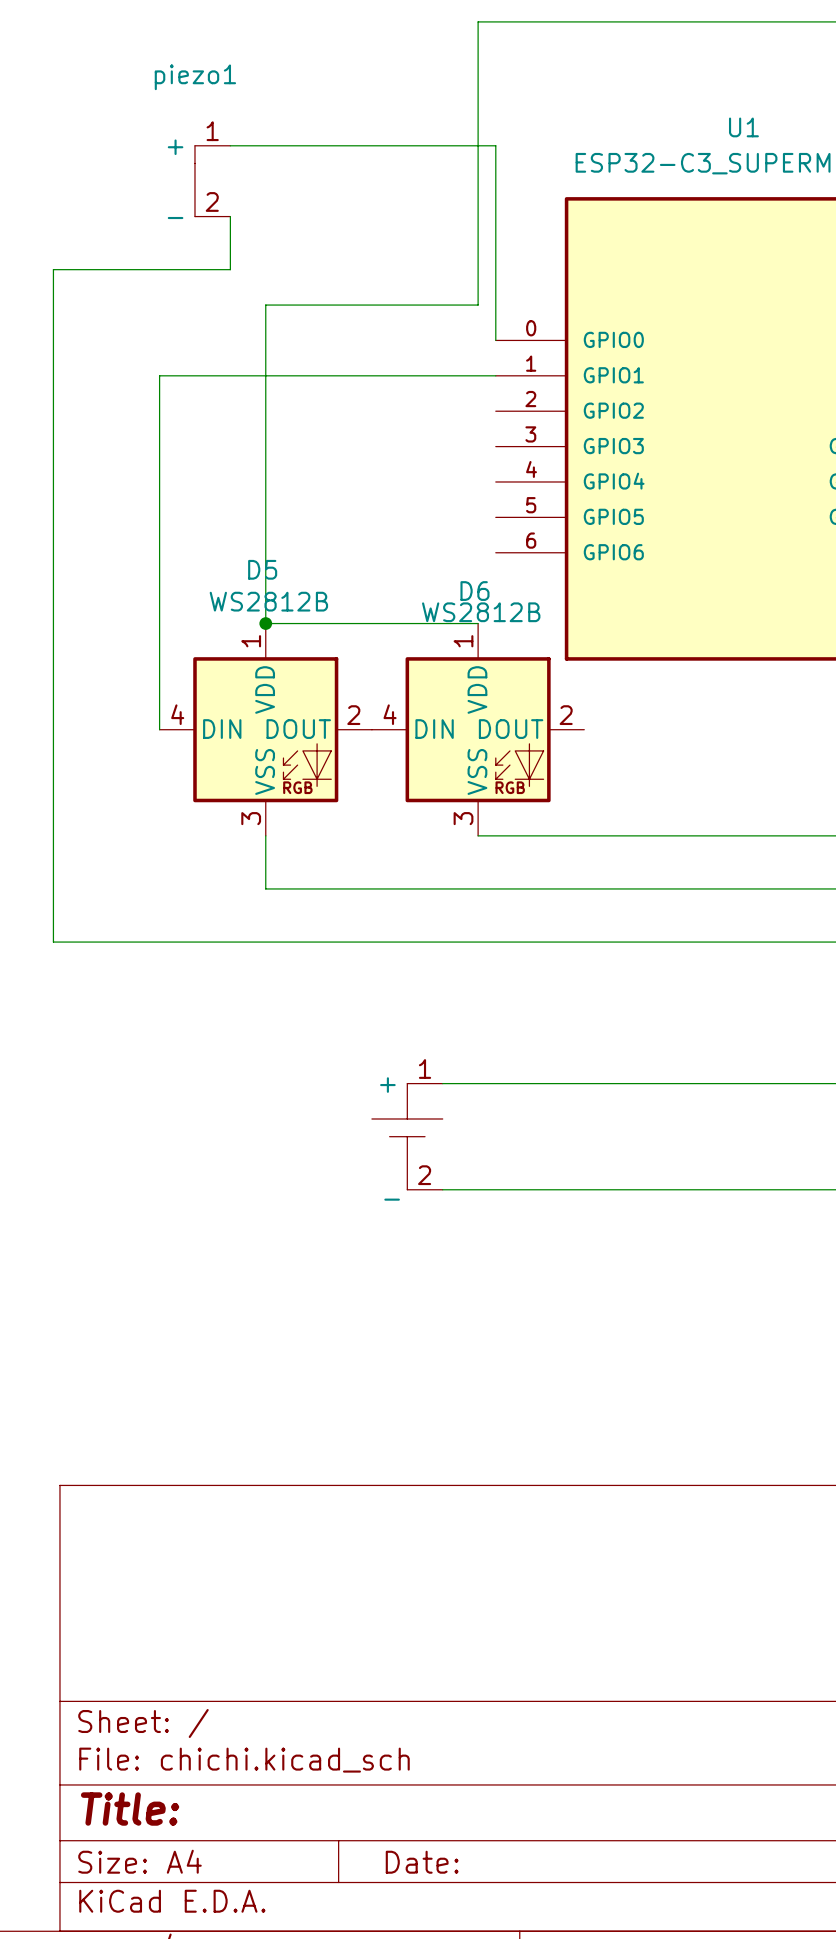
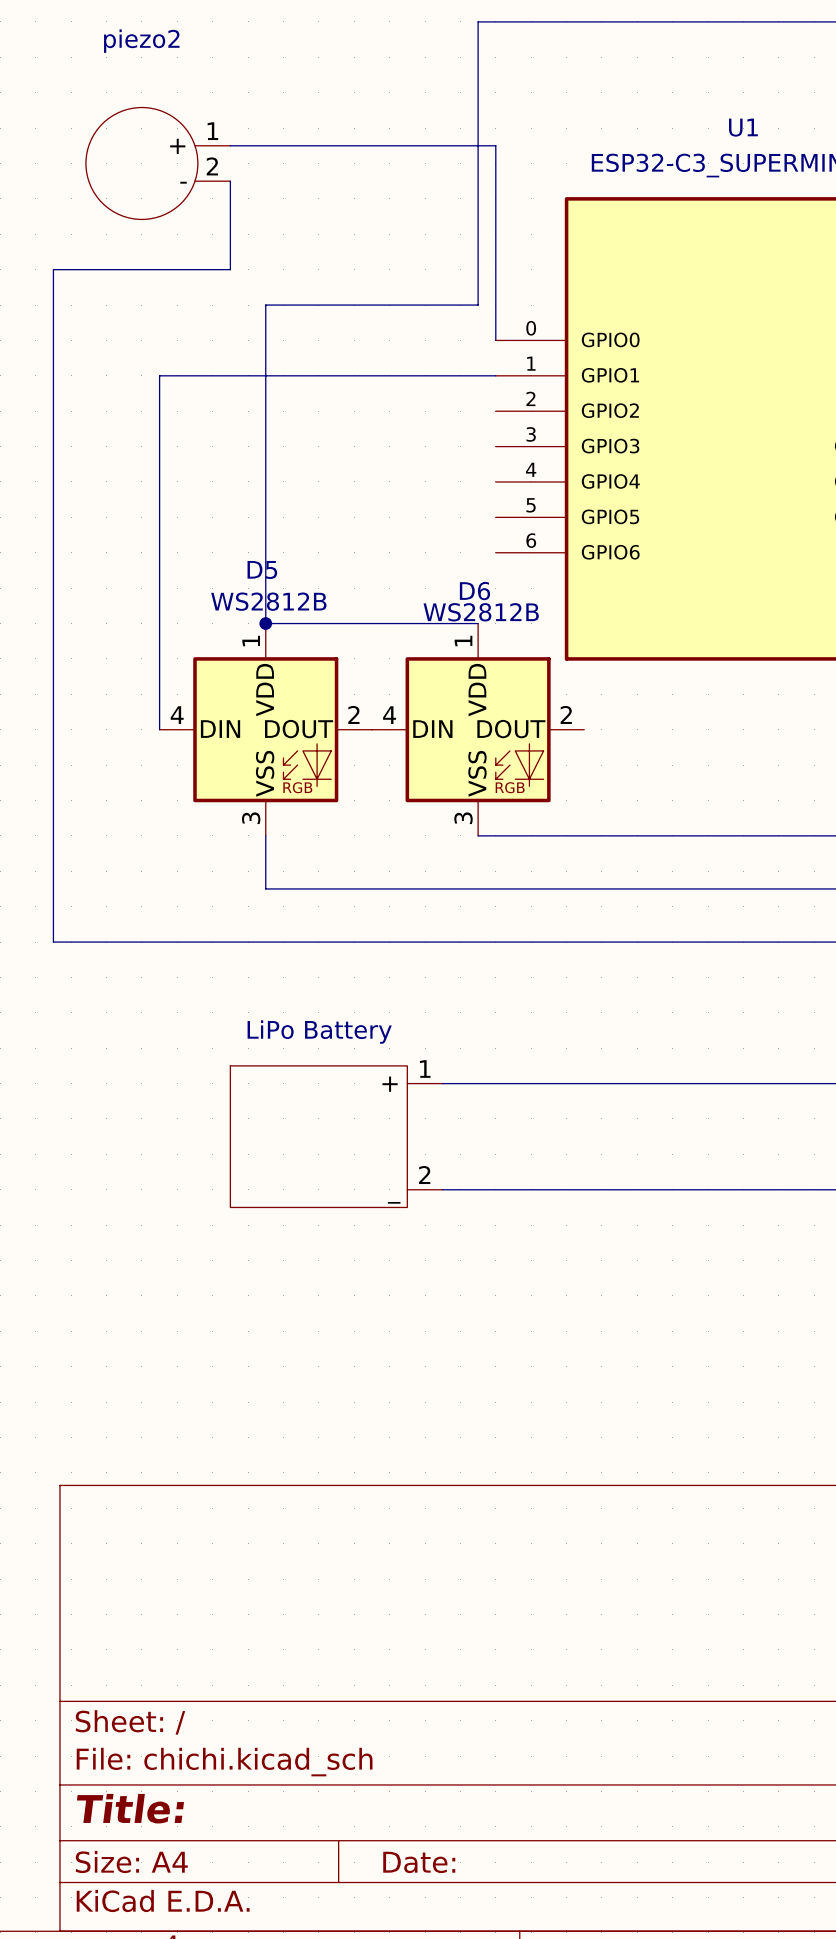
piezo2: none -> (158, 163)
piezo1: (212, 181) -> none
wire: none -> (230, 181) (230, 216)
part: none -> LiPo Battery (336, 1136)
part: (407, 1136) -> none

